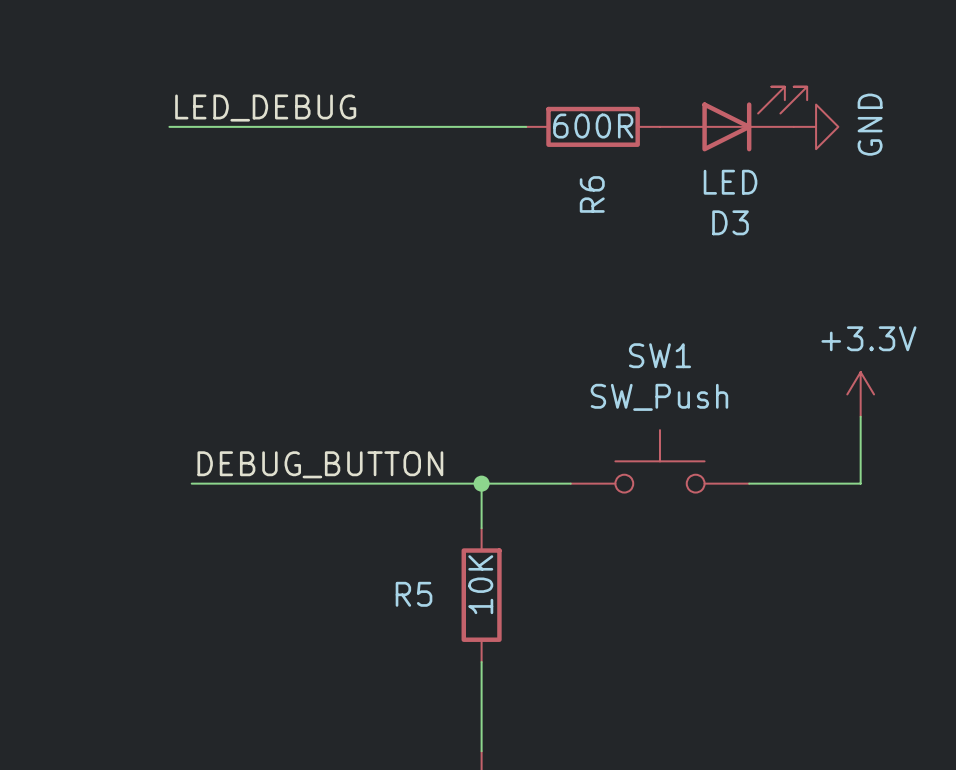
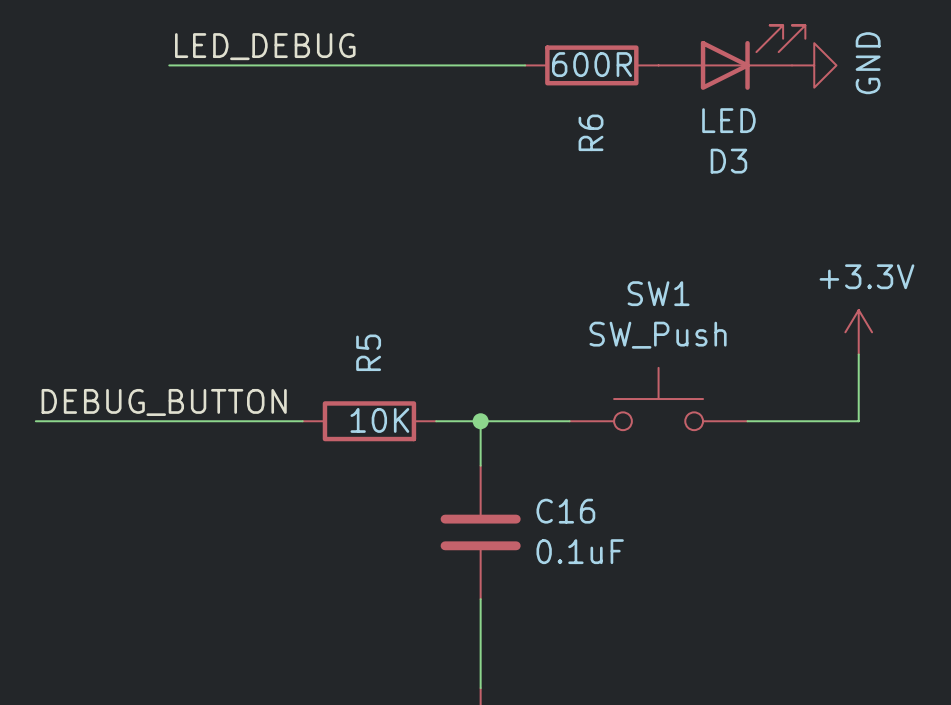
label position: DEBUG_BUTTON (320, 464) -> DEBUG_BUTTON (164, 402)
wire: none -> (35, 421) (191, 421)
wire: (303, 483) (437, 483) -> none
R5 rotation: 0° (481, 595) -> 90° clockwise (369, 421)
R5 position: (481, 595) -> (369, 421)
C16: none -> 0.1uF (480, 532)

